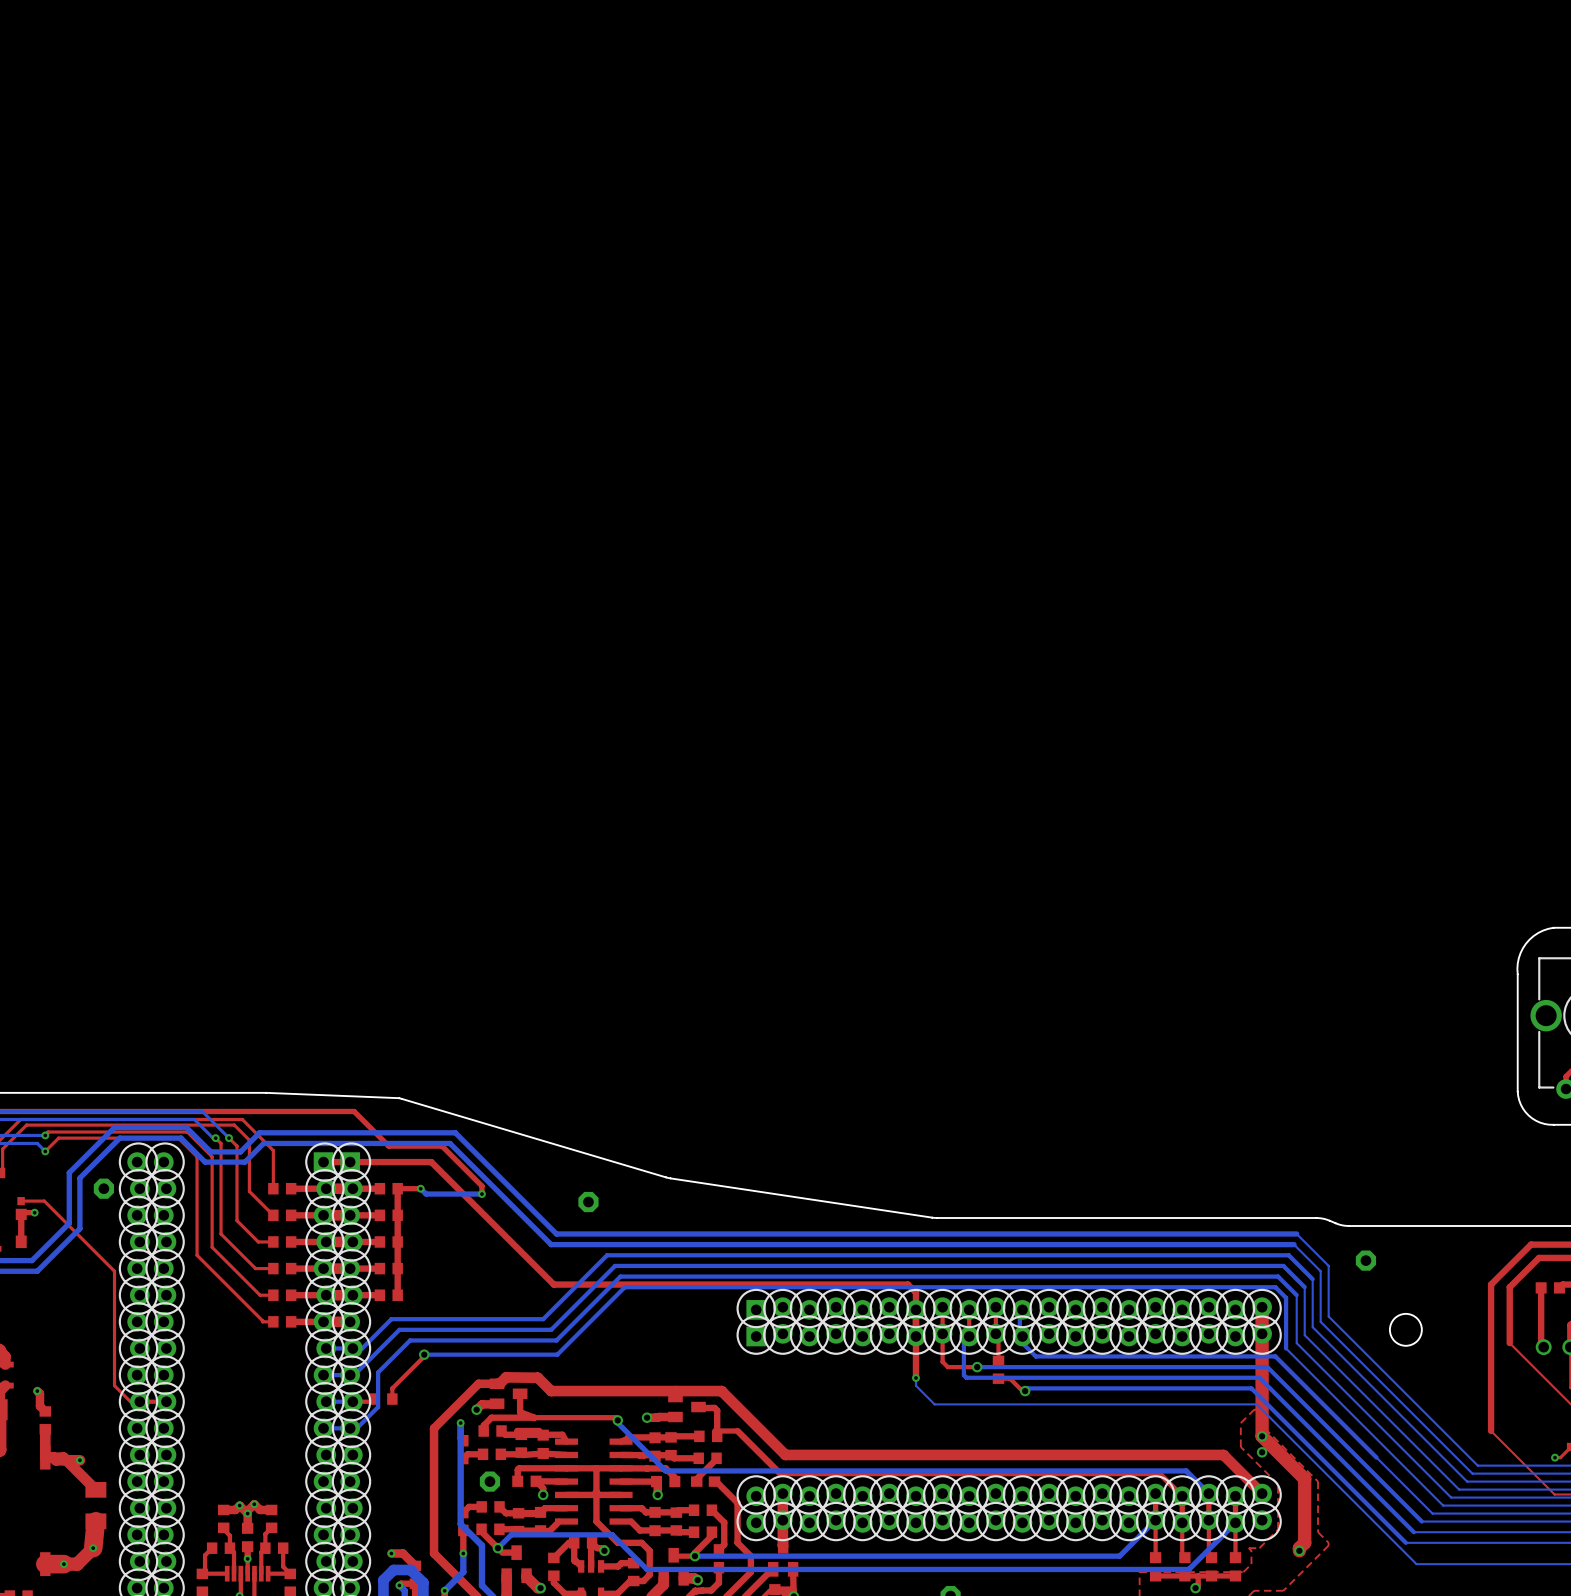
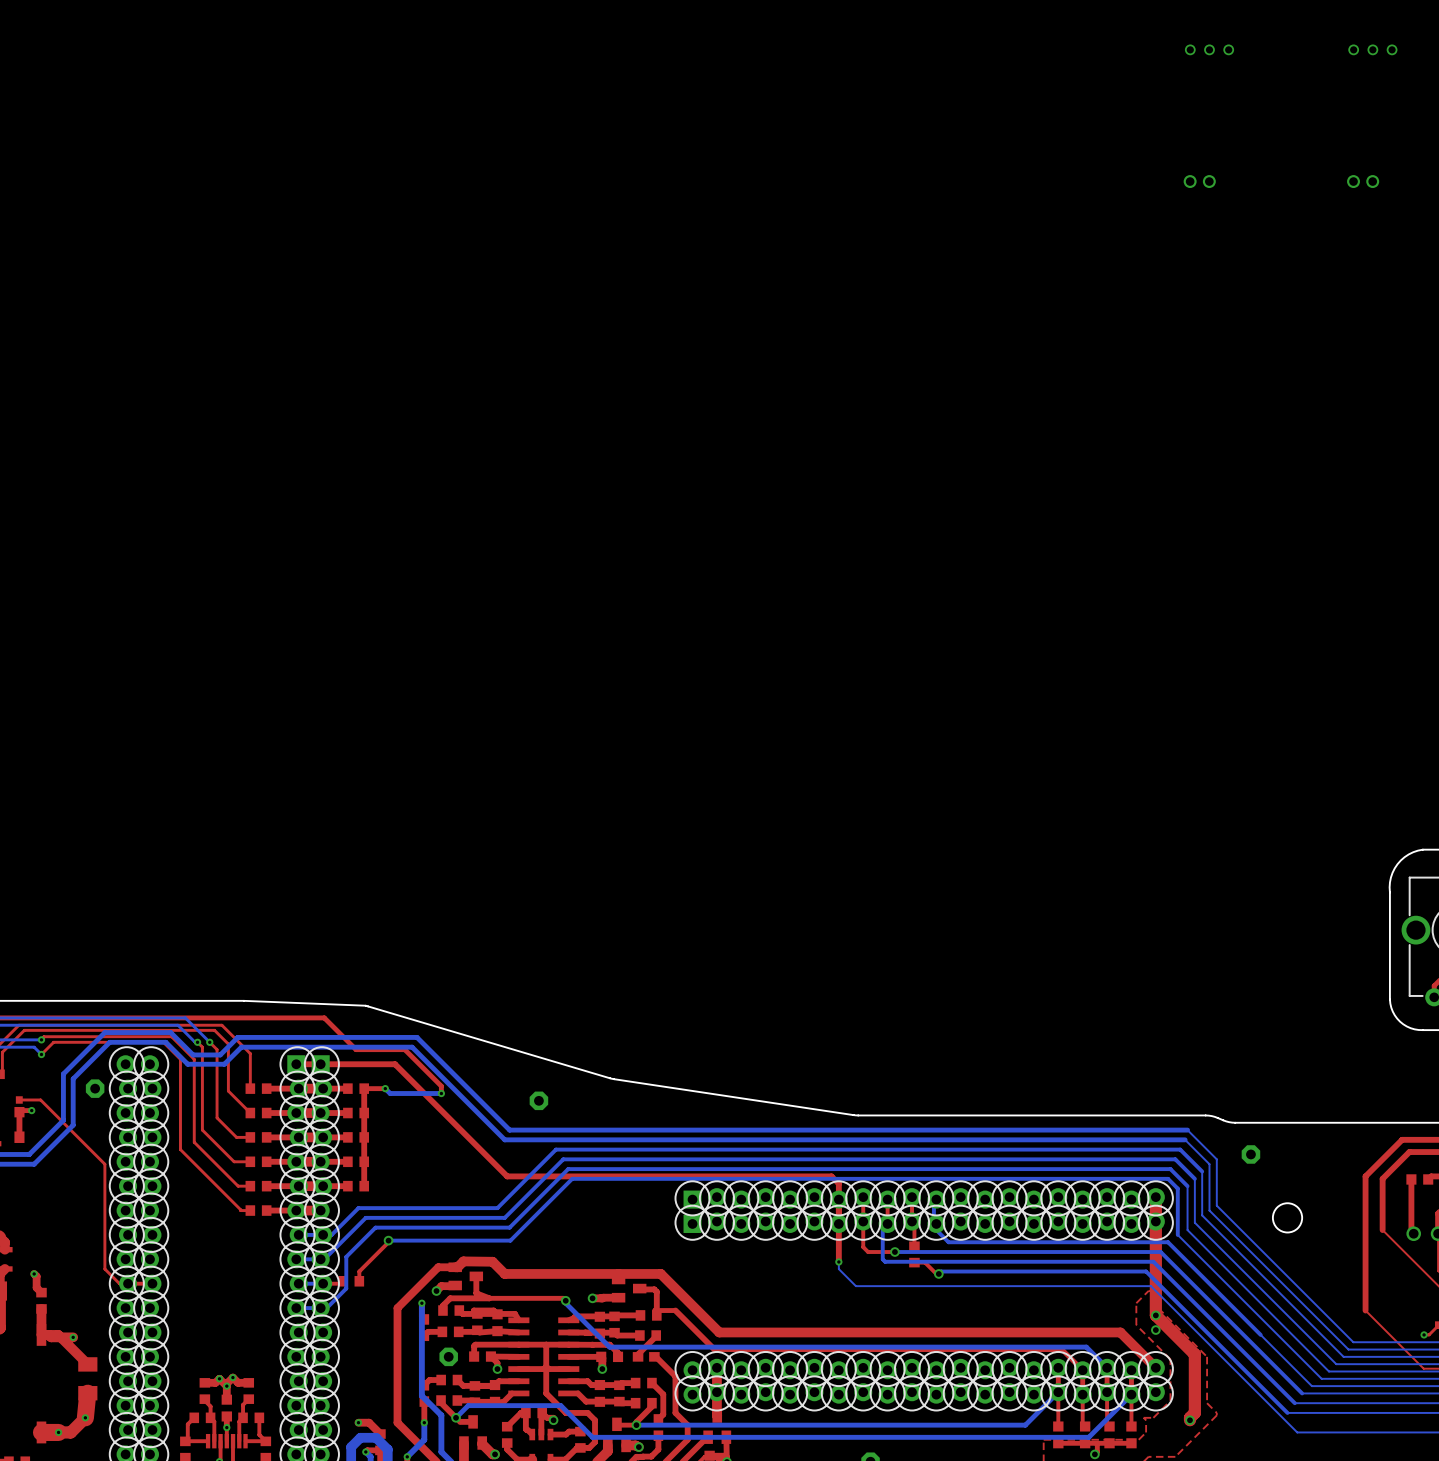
part: none -> (1209, 49)
part: none -> (1372, 49)
part: none -> (1199, 181)
part: none -> (1363, 181)

